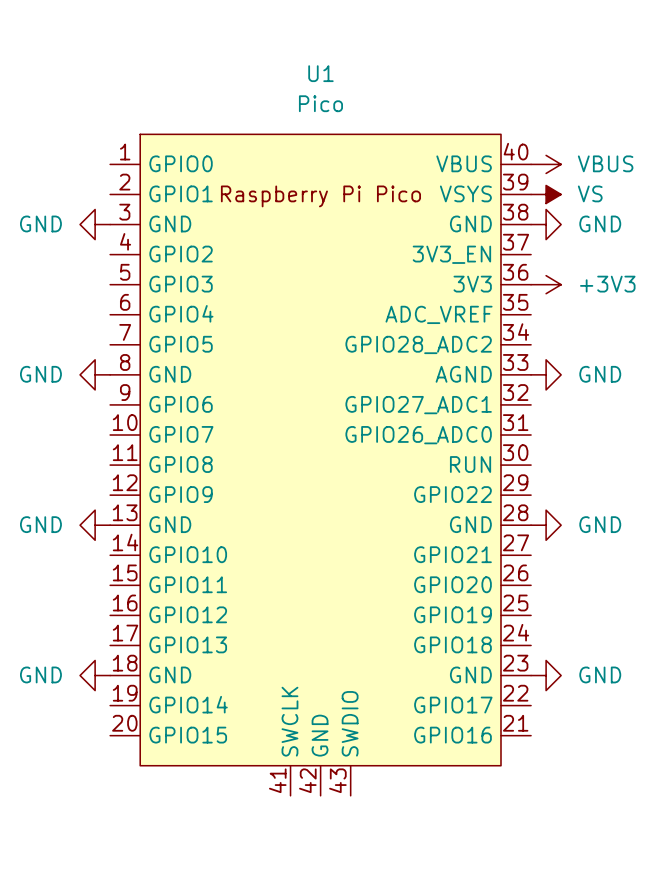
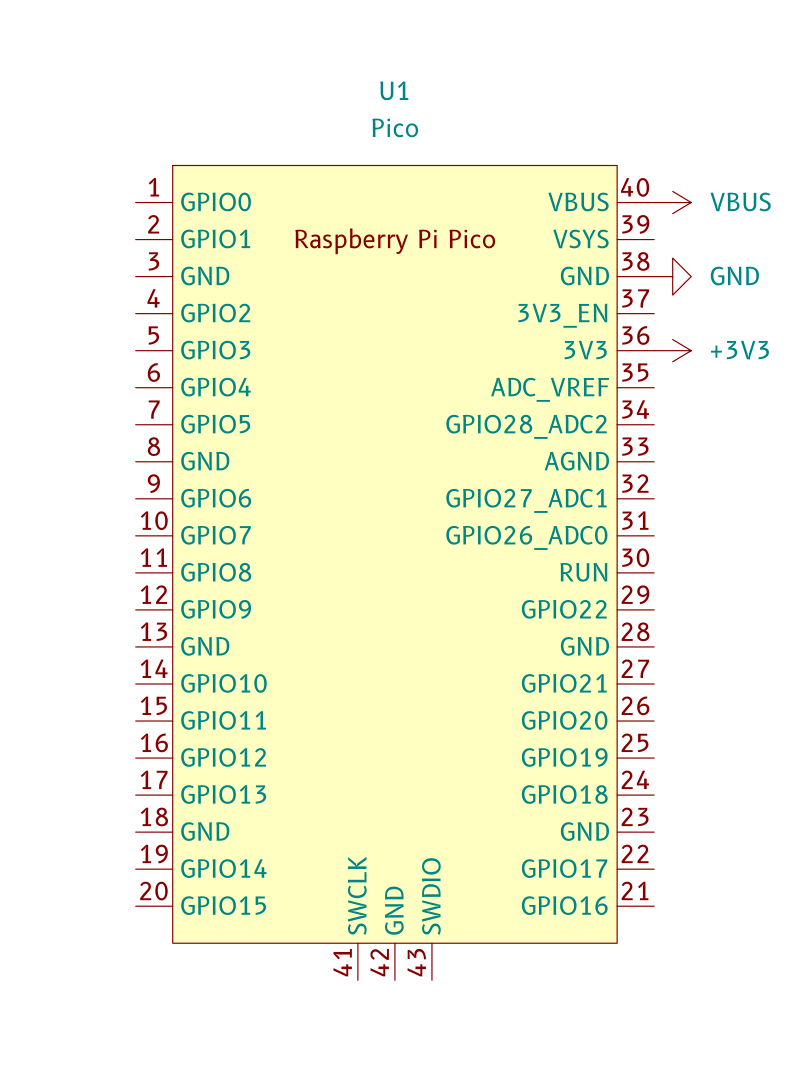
power symbol: VS (546, 194) -> none
power symbol: GND (95, 224) -> none
power symbol: GND (95, 374) -> none
power symbol: GND (546, 374) -> none
power symbol: GND (95, 525) -> none
power symbol: GND (546, 525) -> none
power symbol: GND (95, 675) -> none
power symbol: GND (546, 675) -> none

